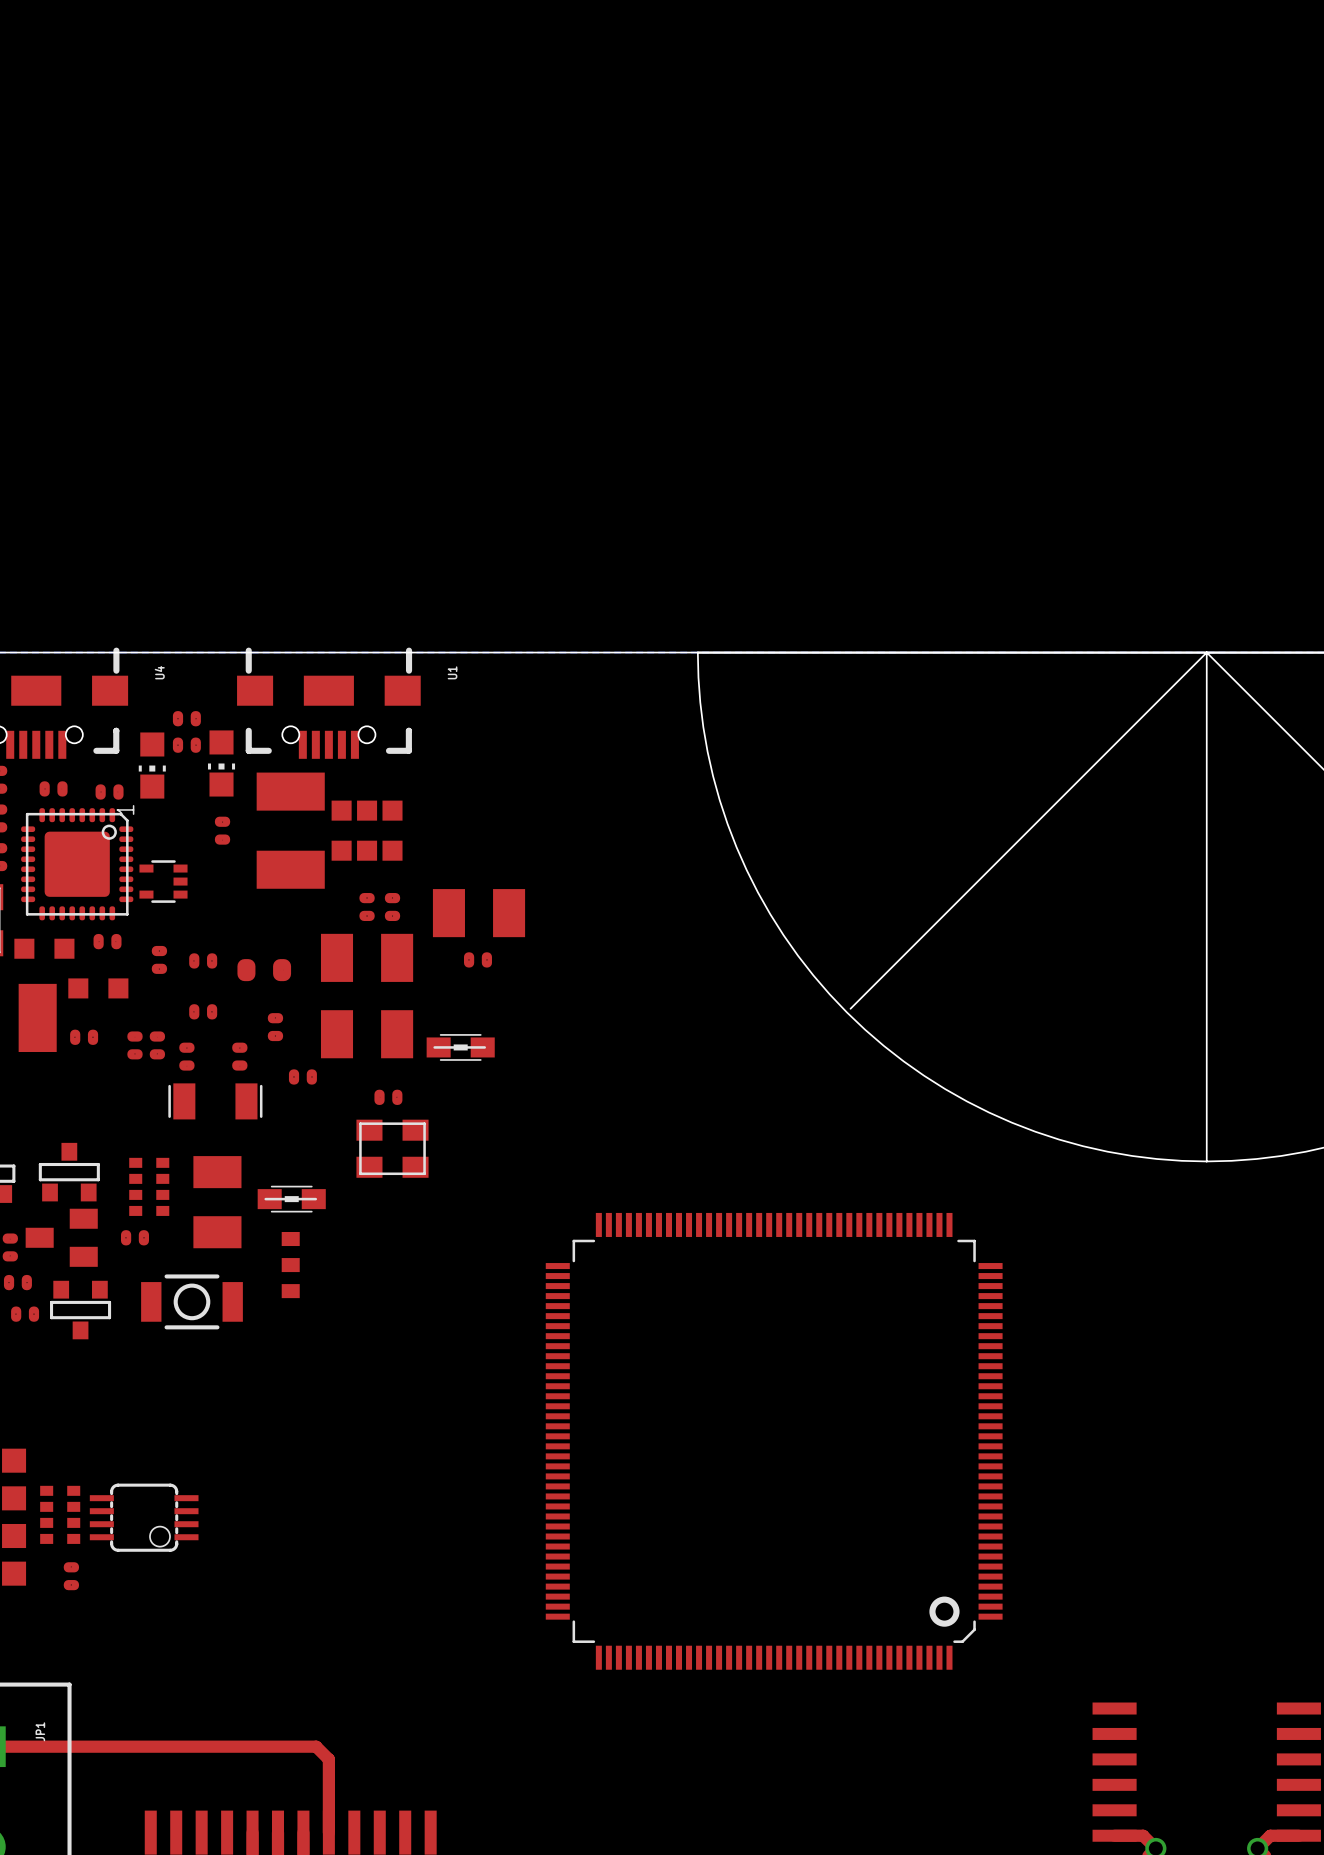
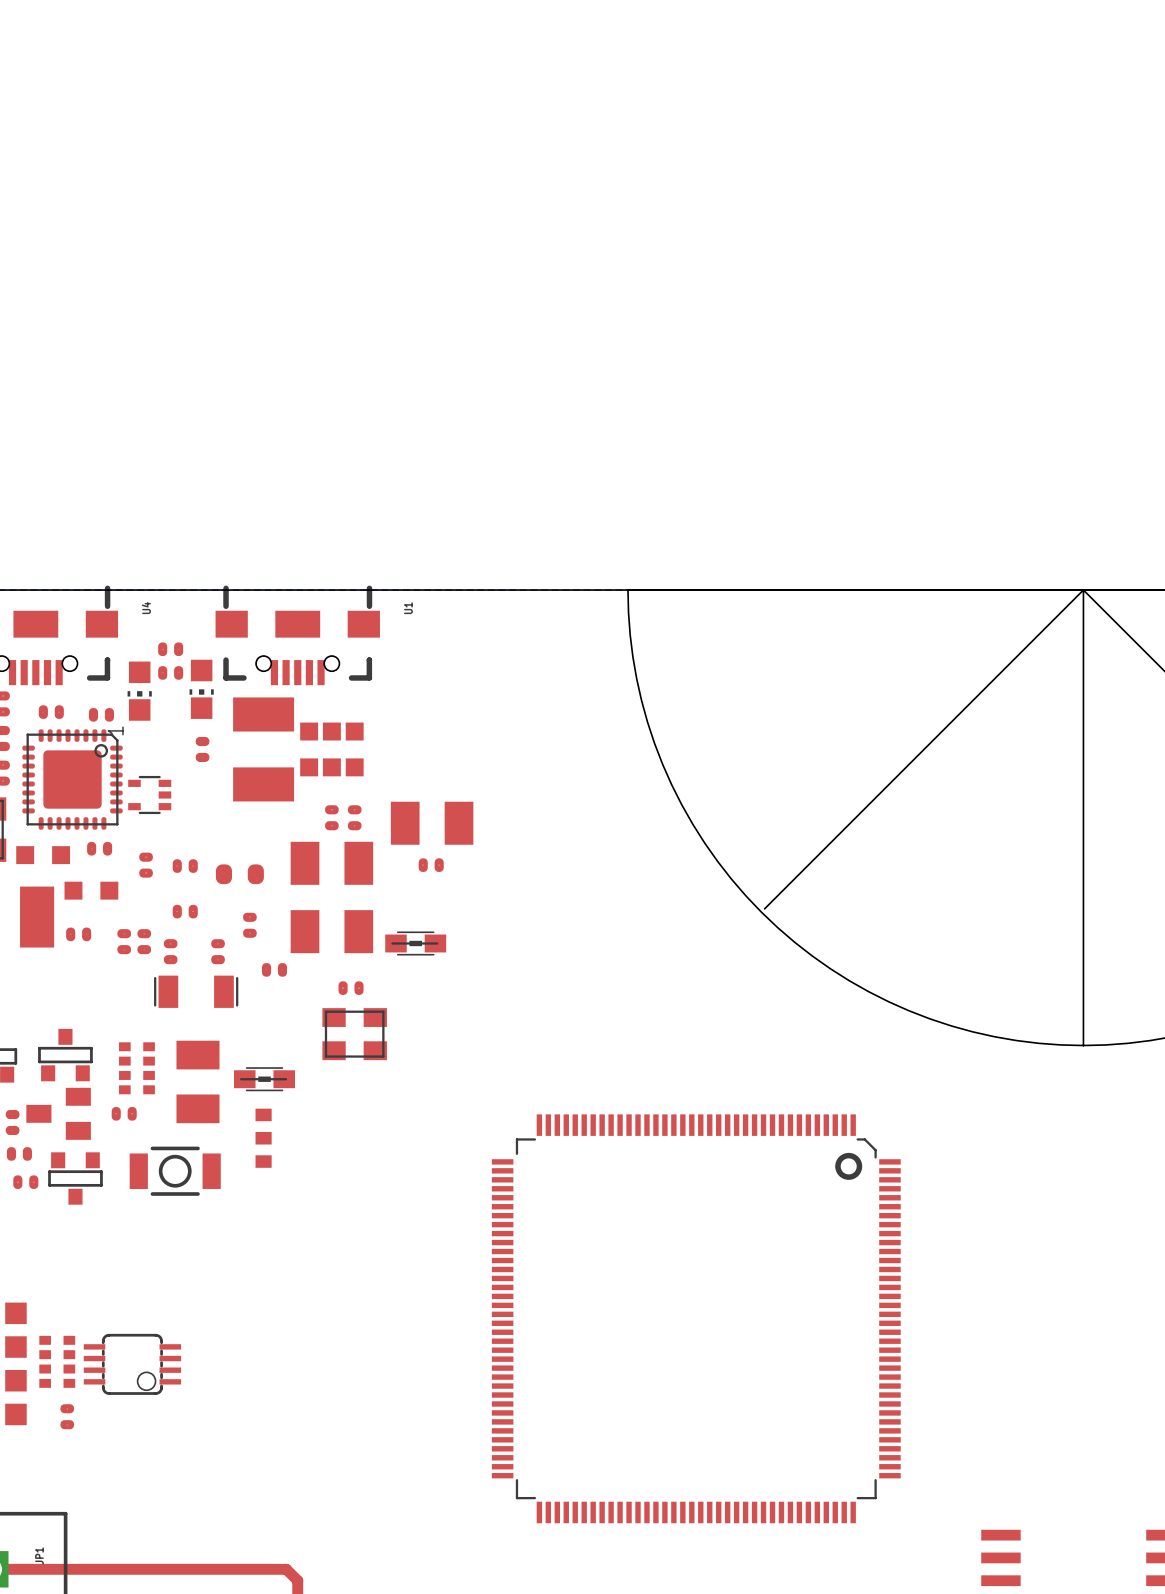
part rotation: 0° (774, 1441) -> 90° counterclockwise (696, 1318)

